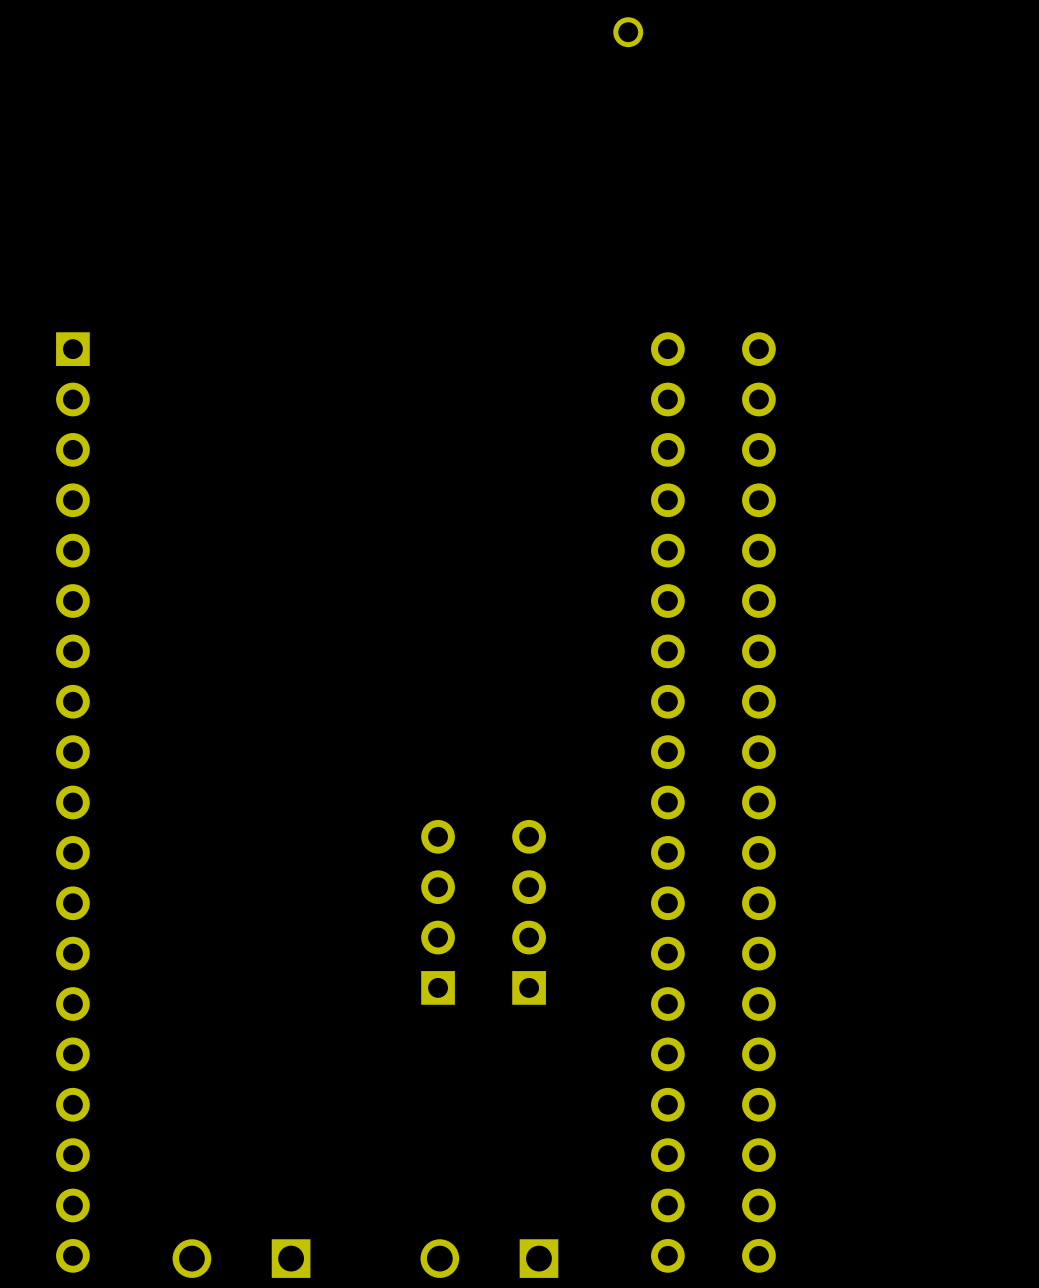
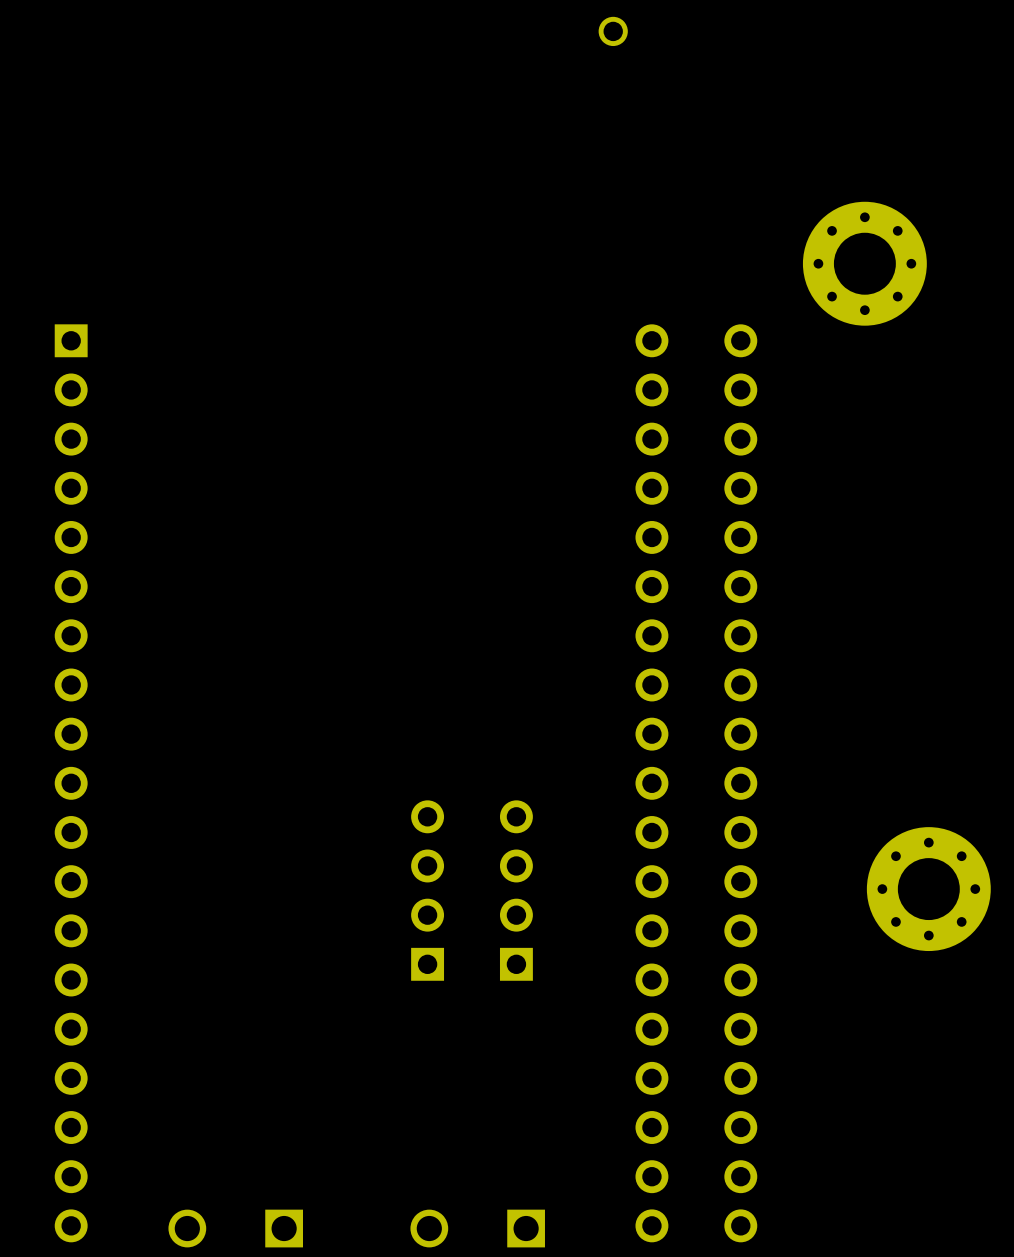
part: none -> (864, 263)
part: none -> (928, 889)

